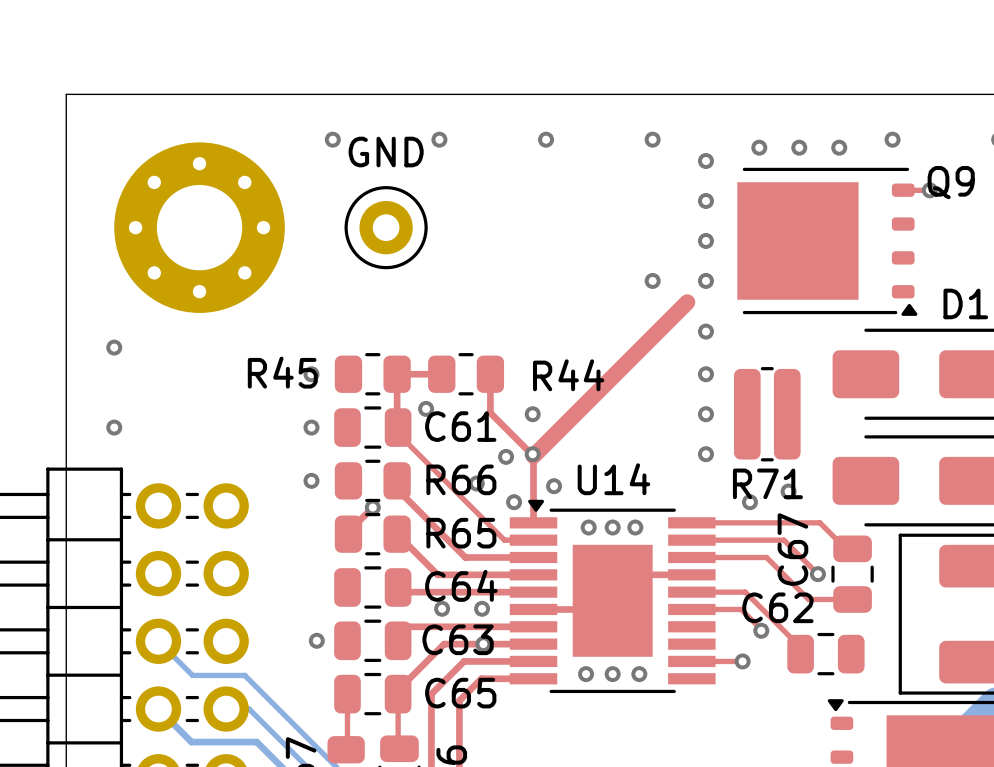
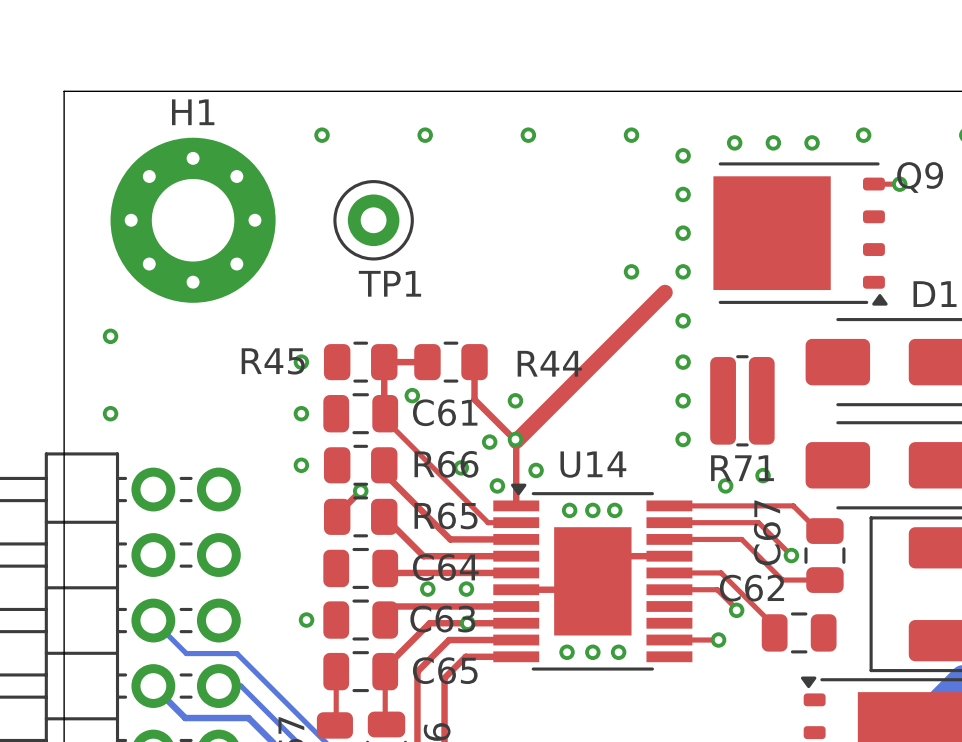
H1 name: none -> H1 (193, 112)
TP1 value: GND (386, 152) -> none
TP1 name: none -> TP1 (389, 283)

